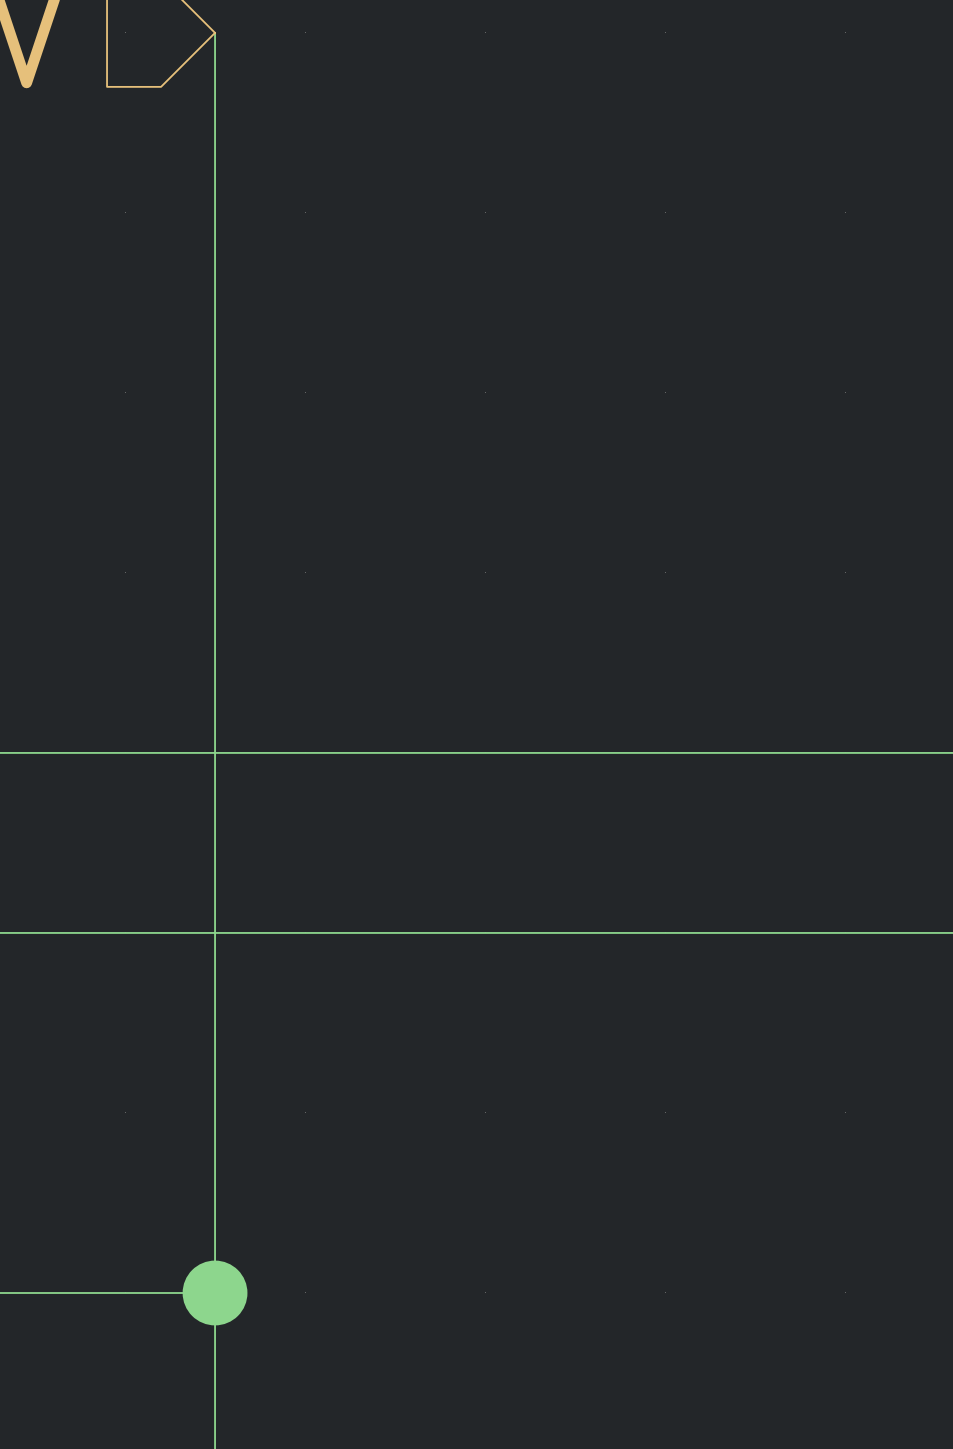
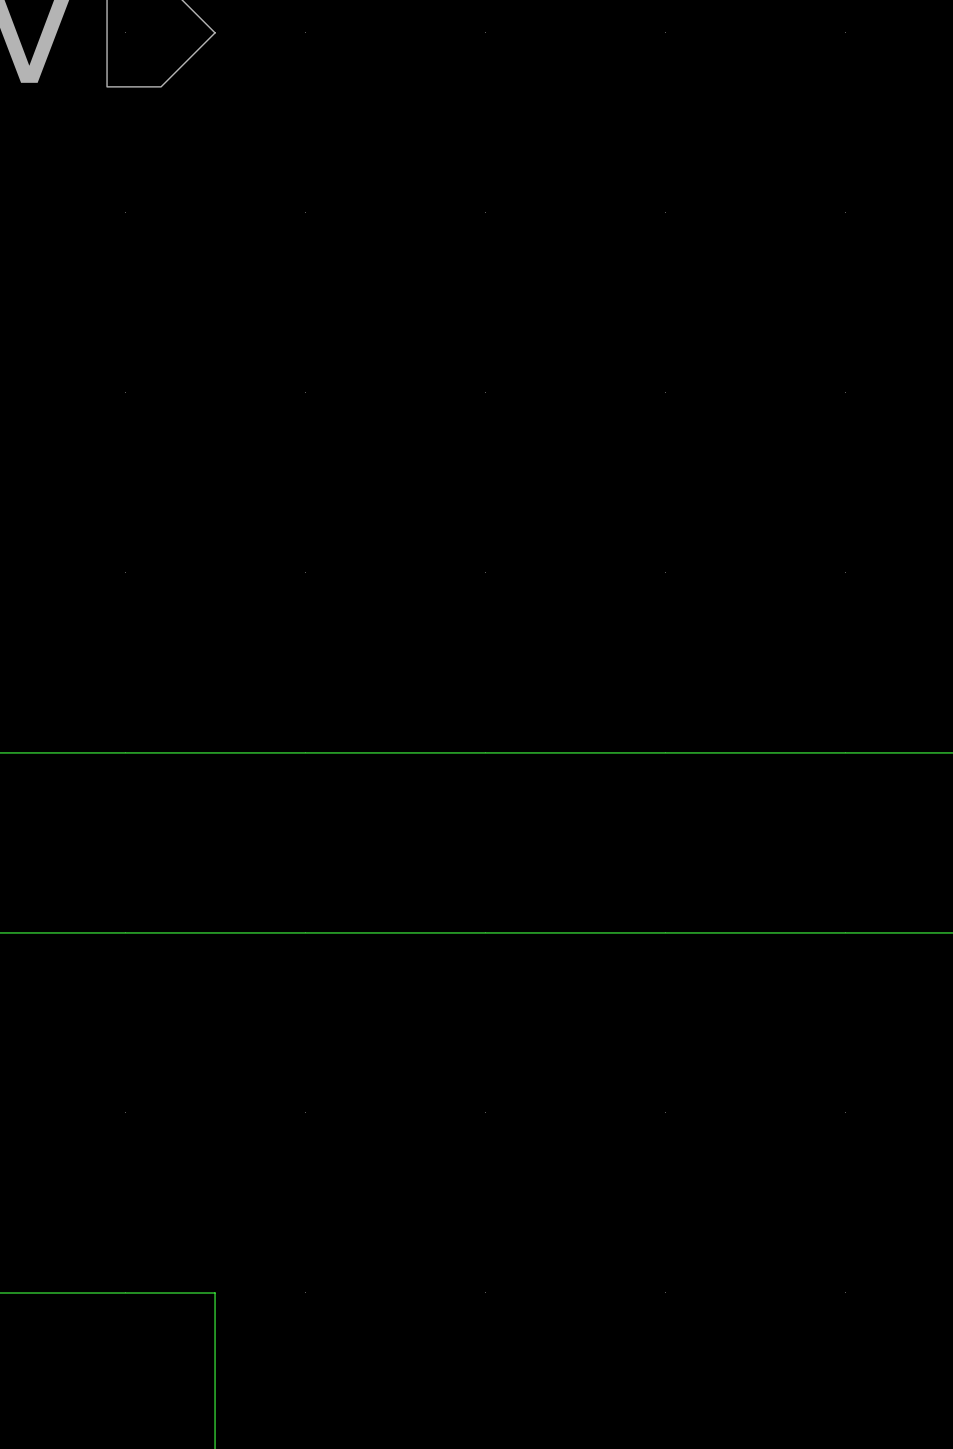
wire: (215, 32) (215, 1292) -> none
junction: (215, 1292) -> none

